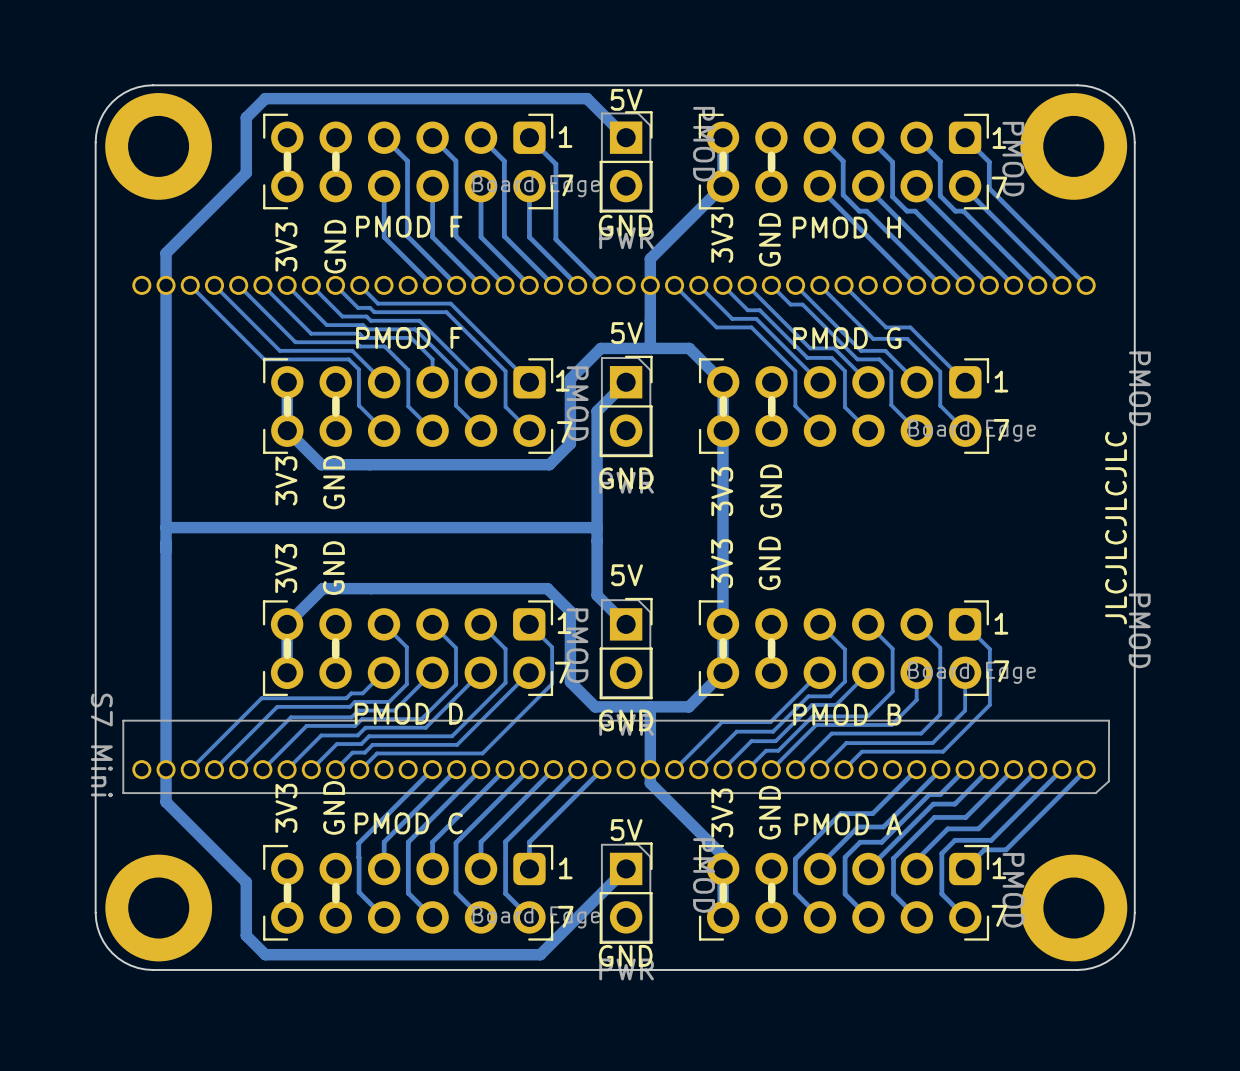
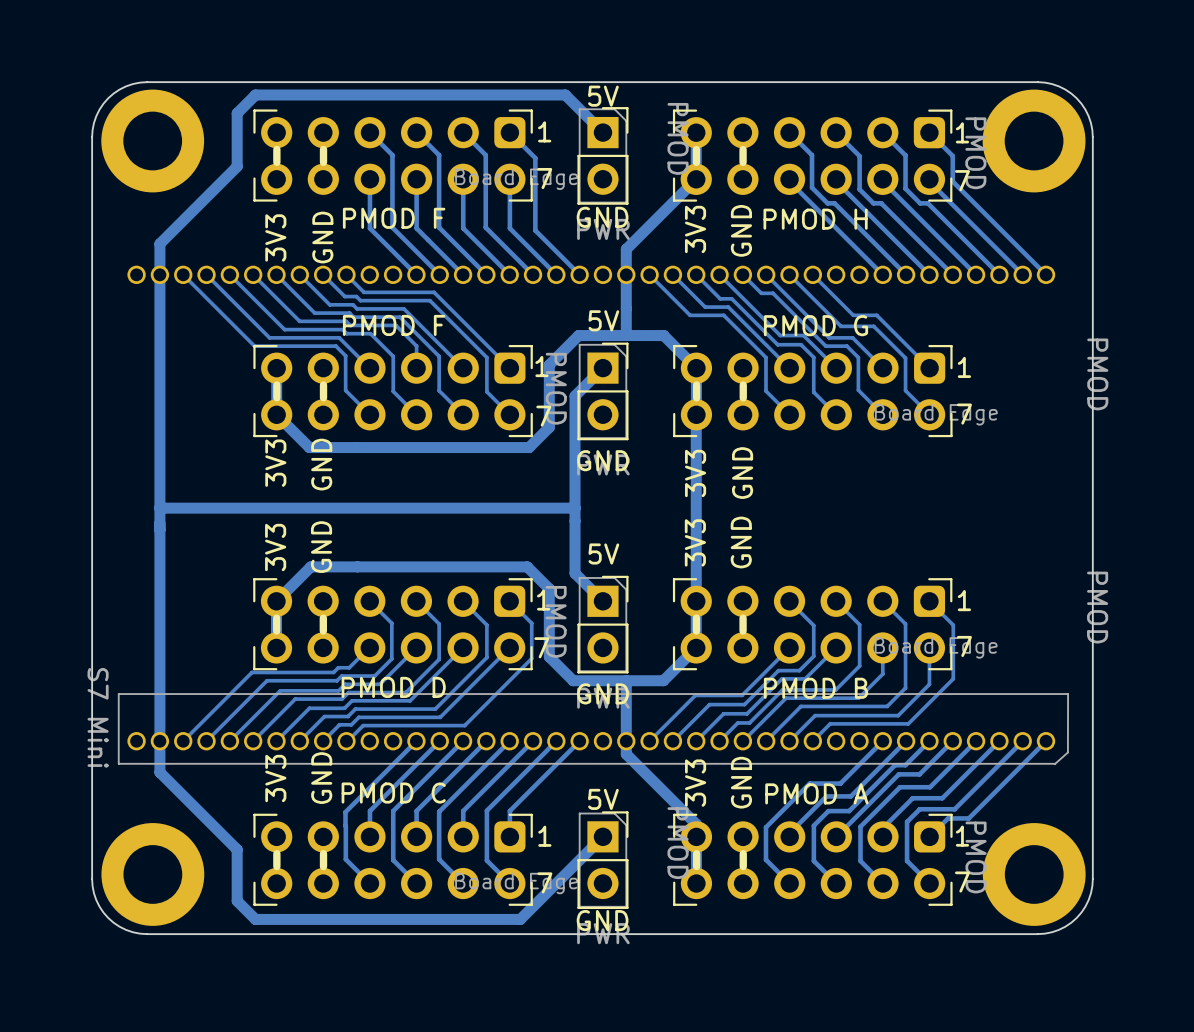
text: JLCJLCJLCJLC (1115, 528) -> none

